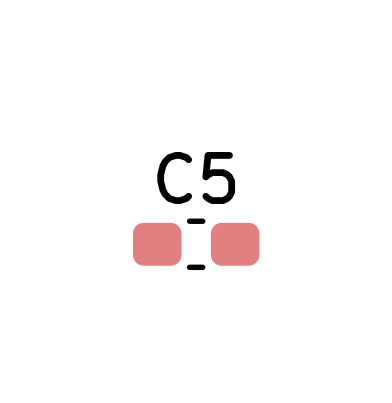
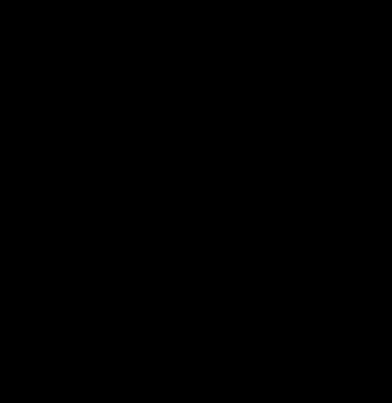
C5: (196, 244) -> none

